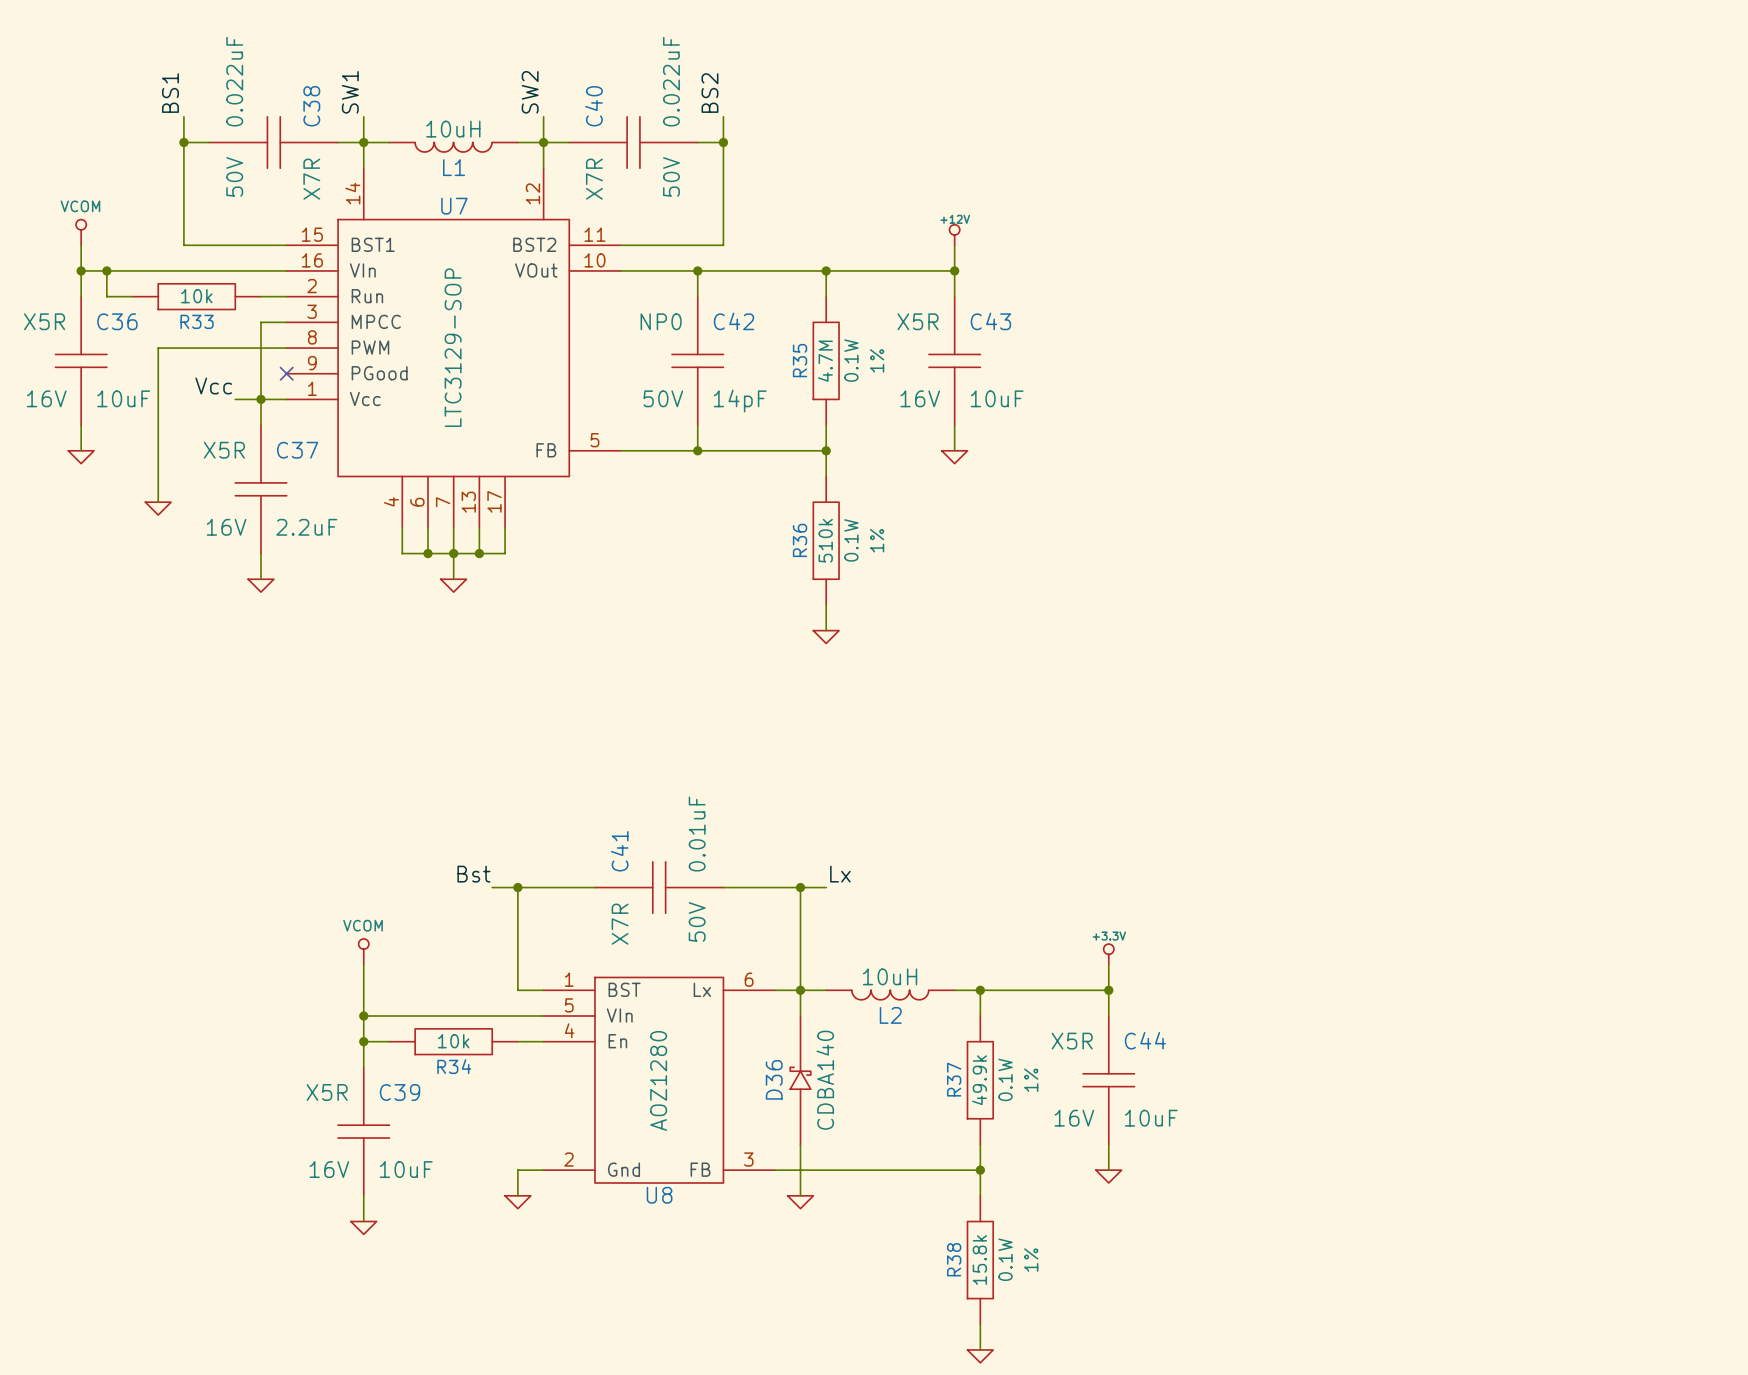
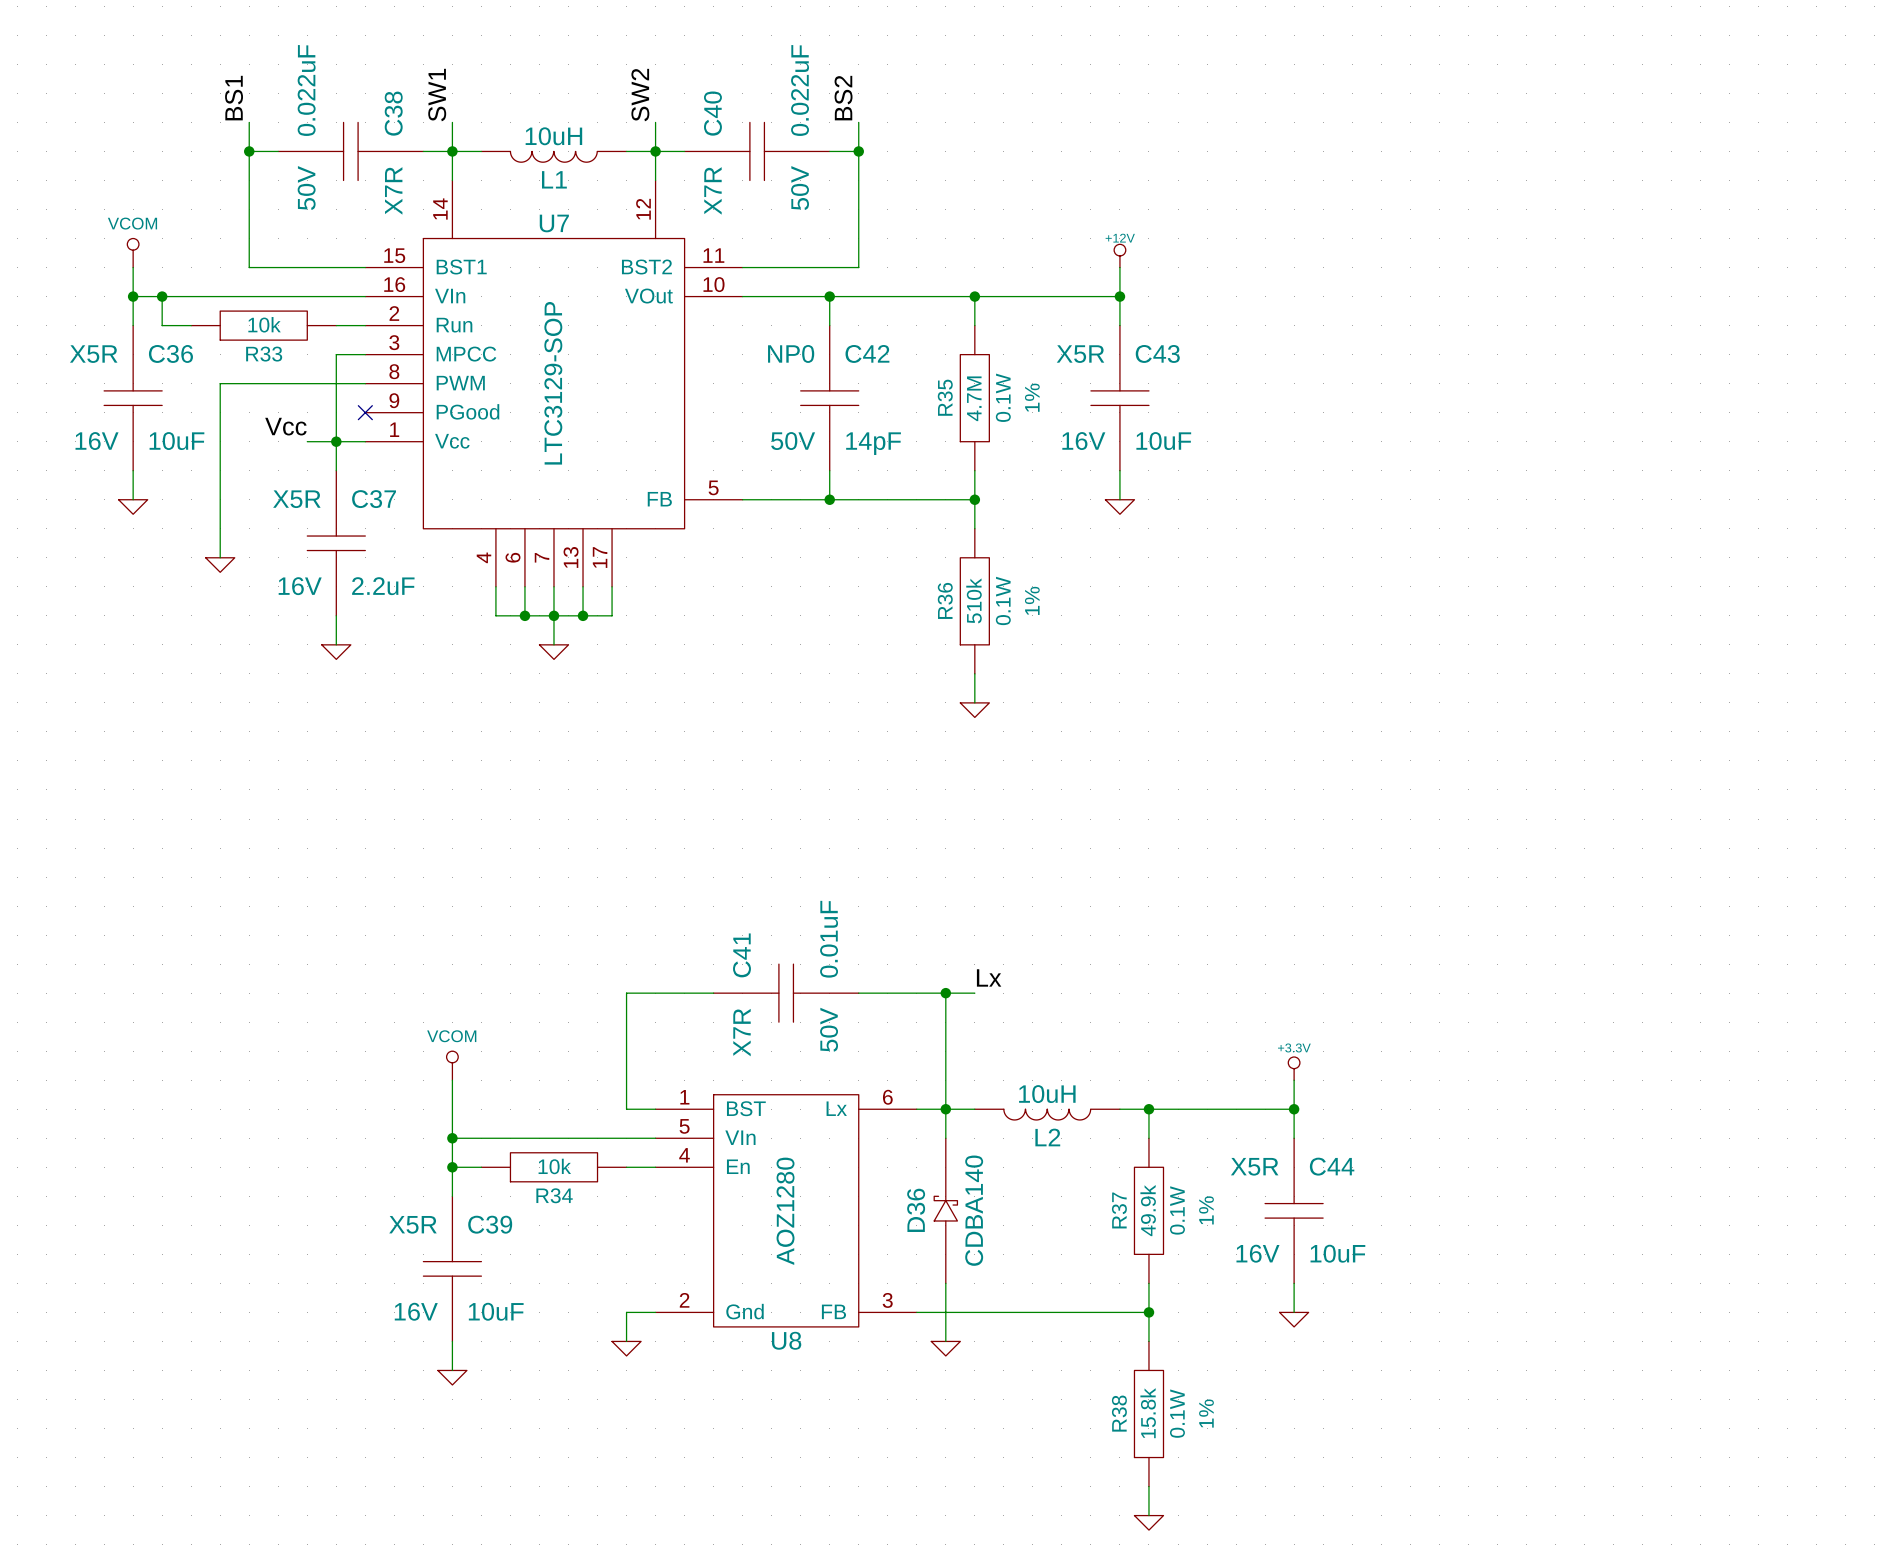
label: Bst (473, 874) -> none
wire: (492, 887) (517, 887) -> none
junction: (517, 887) -> none

